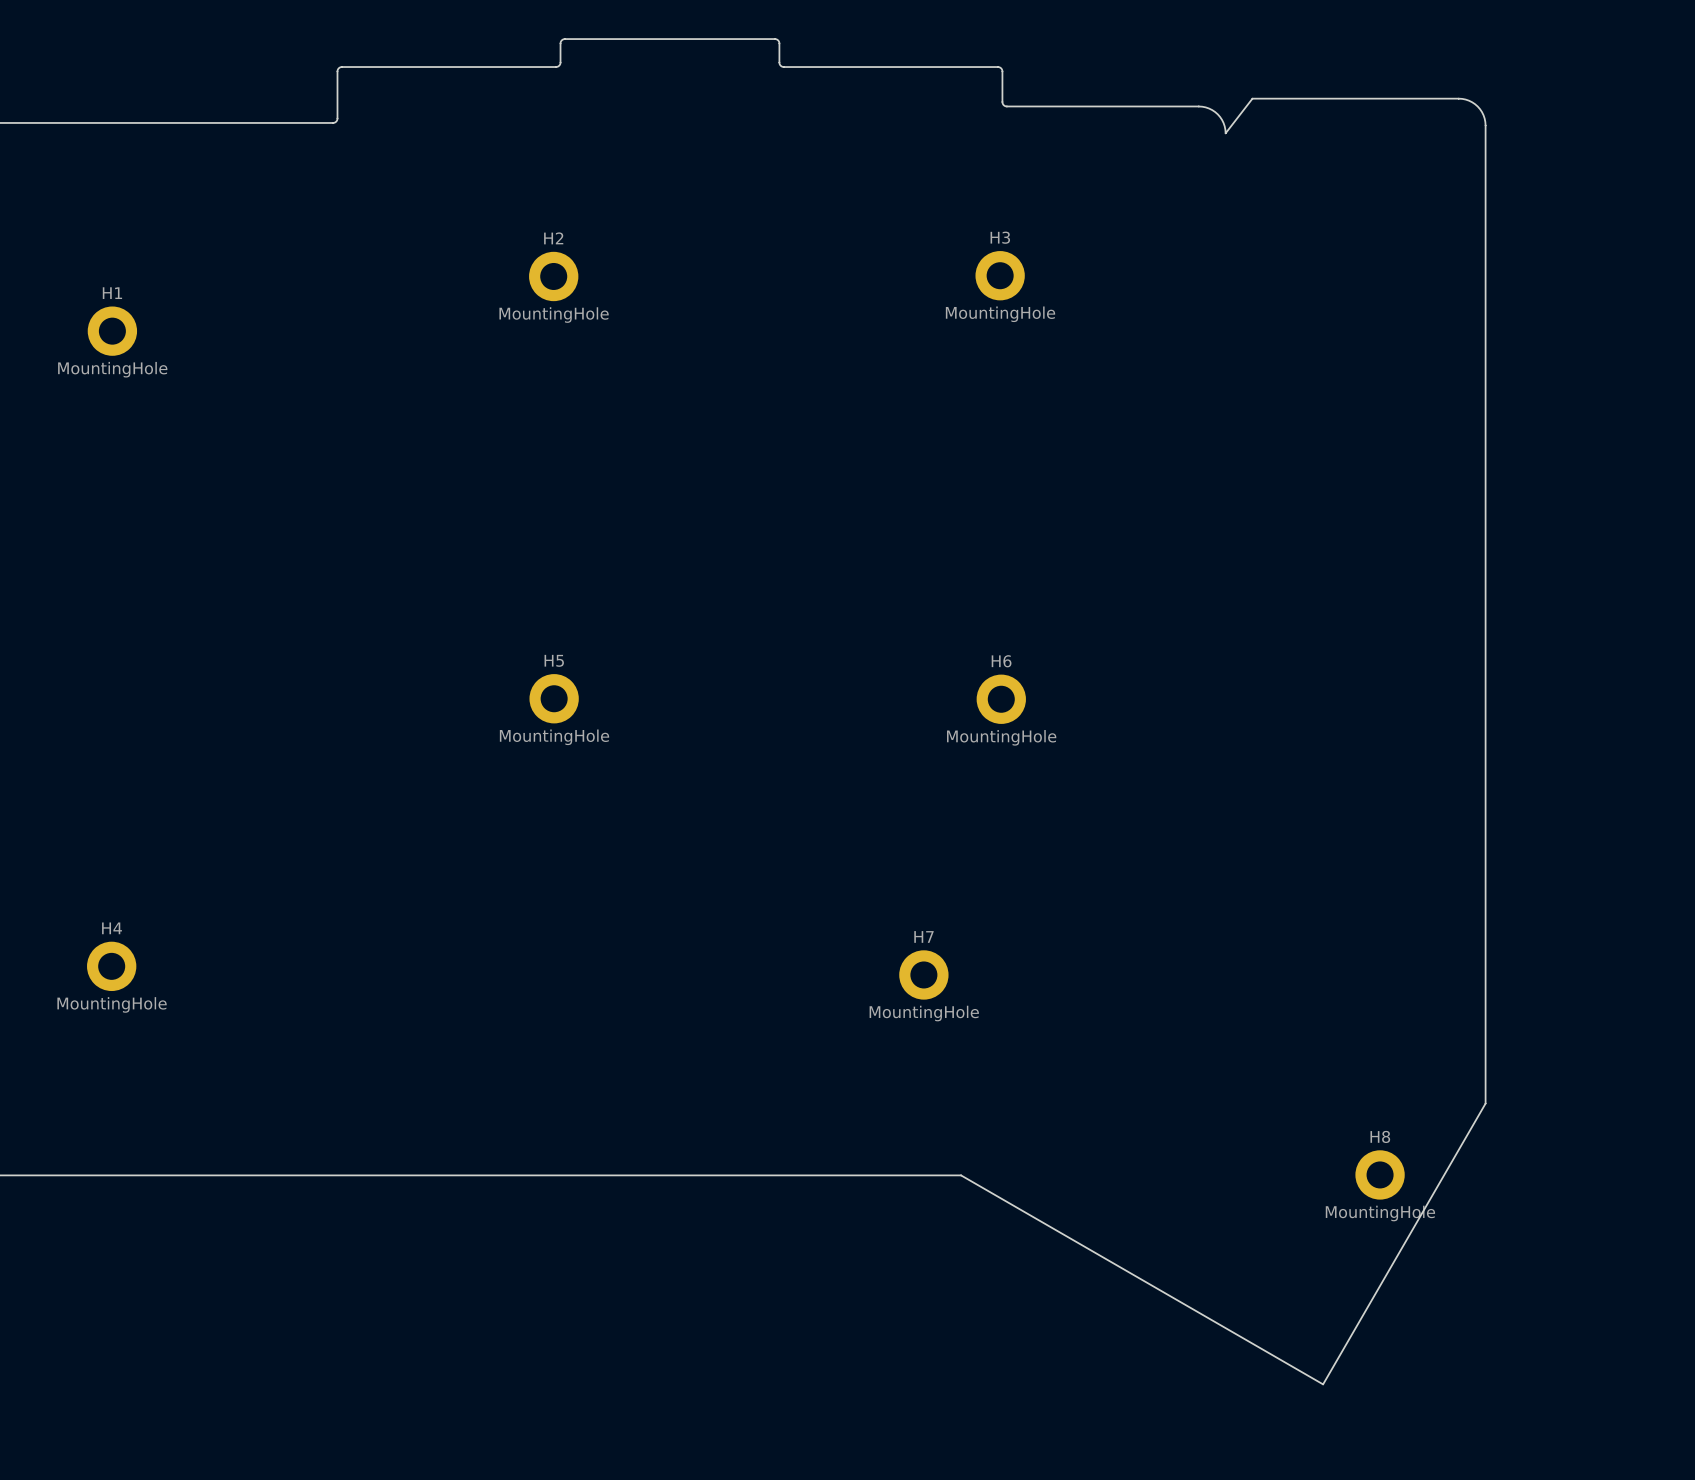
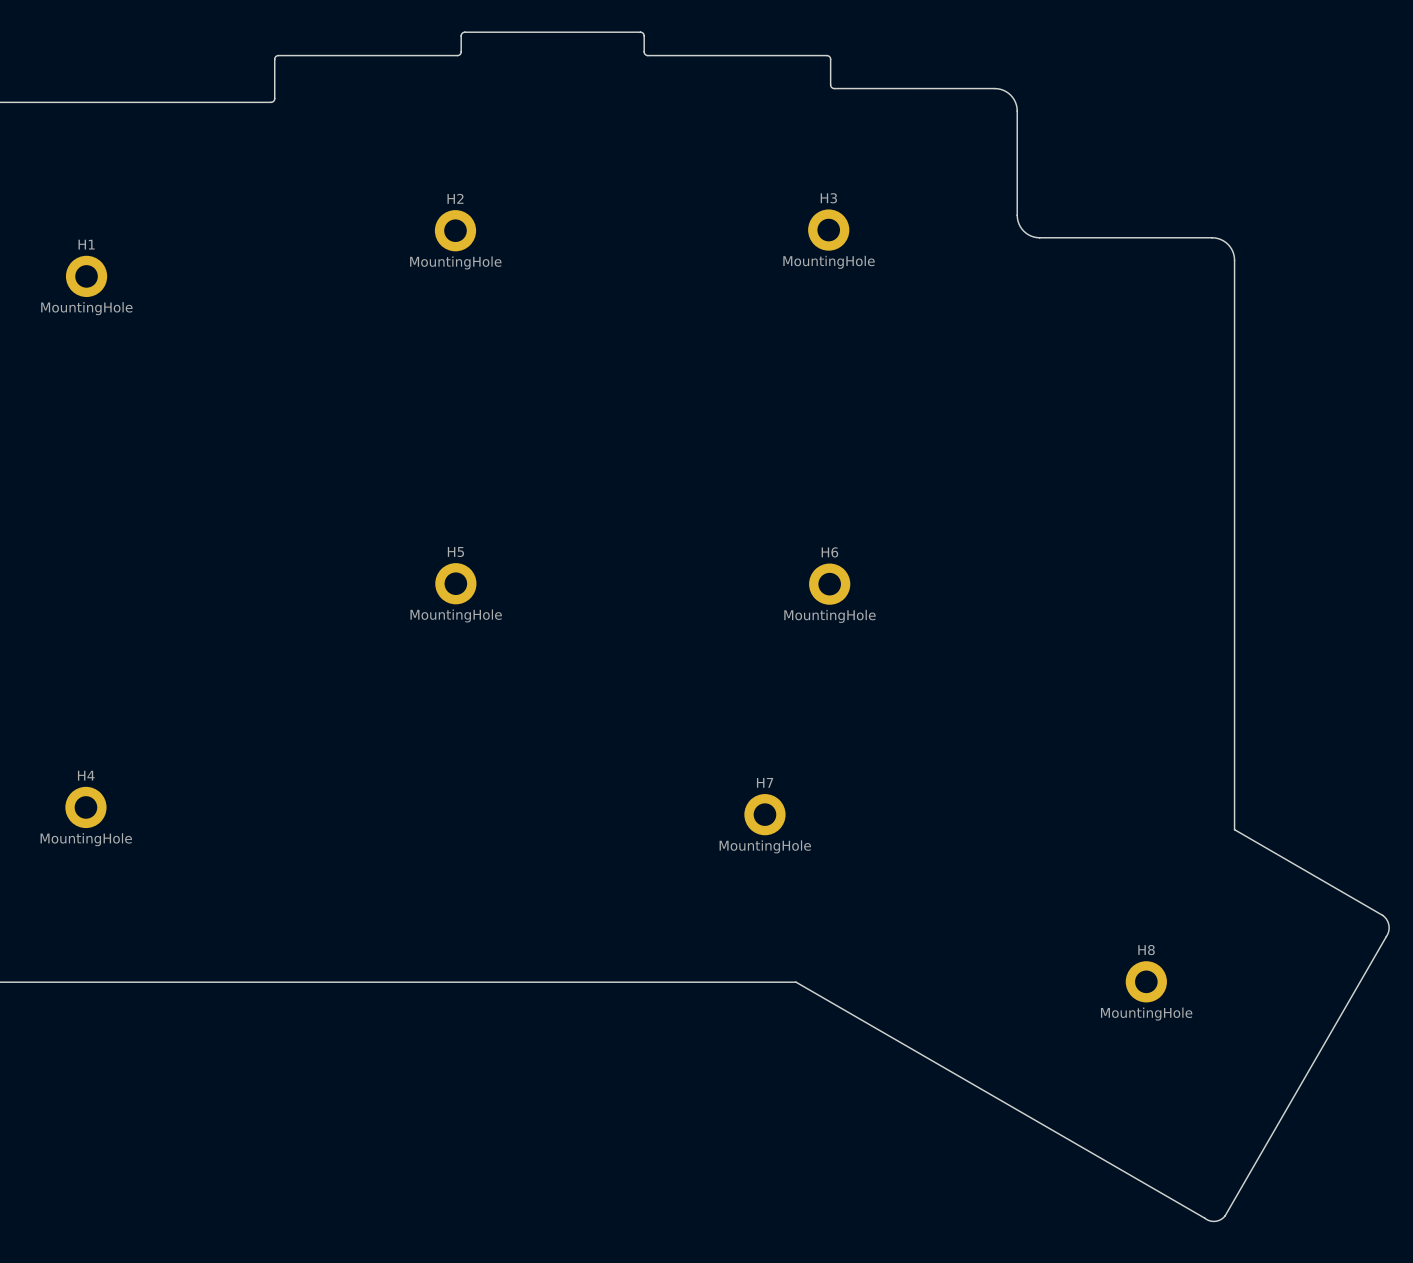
board edge: (1225, 133) (1252, 98) (1458, 98) (1475, 104) (1481, 112) (1485, 125) (1485, 311) -> (1017, 111) (1017, 218) (1020, 226) (1026, 233) (1039, 237) (1215, 237) (1223, 240) (1229, 246) (1234, 260)
board edge: (1485, 992) (1485, 1103) (1323, 1384) (961, 1175) -> (1234, 829) (1382, 915) (1387, 920) (1389, 928) (1387, 935) (1225, 1215) (1218, 1220) (1206, 1219) (796, 982)

